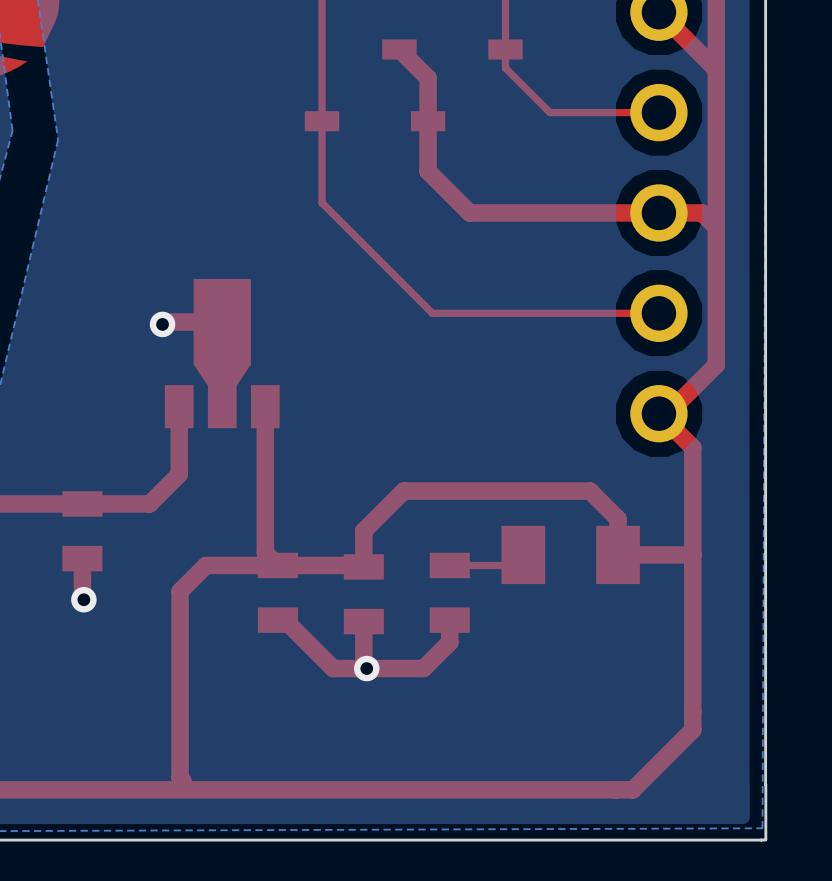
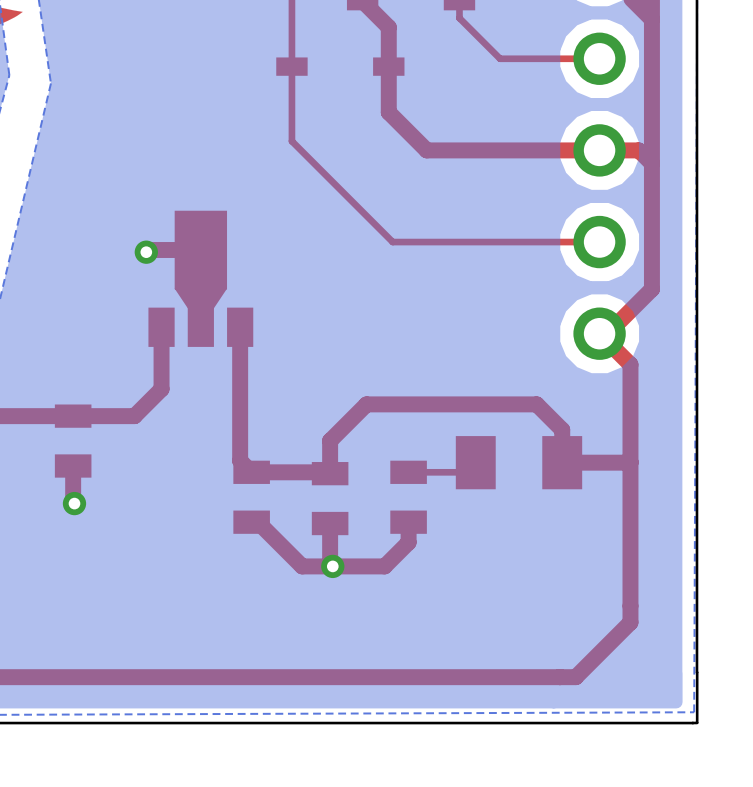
top track: (277, 565) (206, 565) (180, 591) (180, 777) (182, 780) -> none

